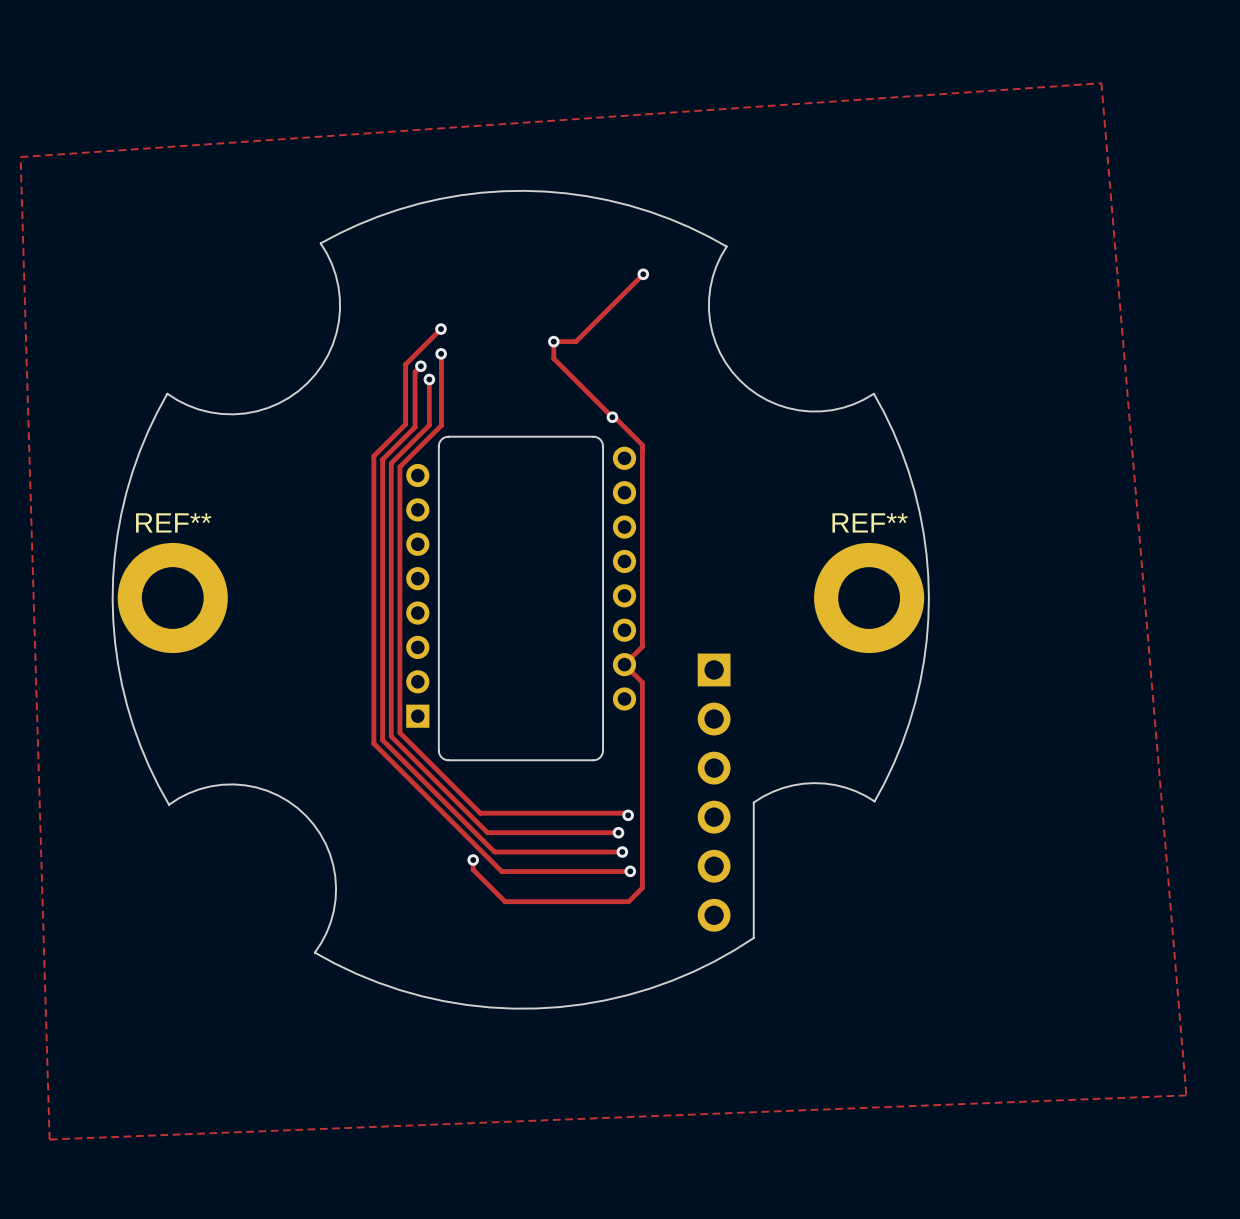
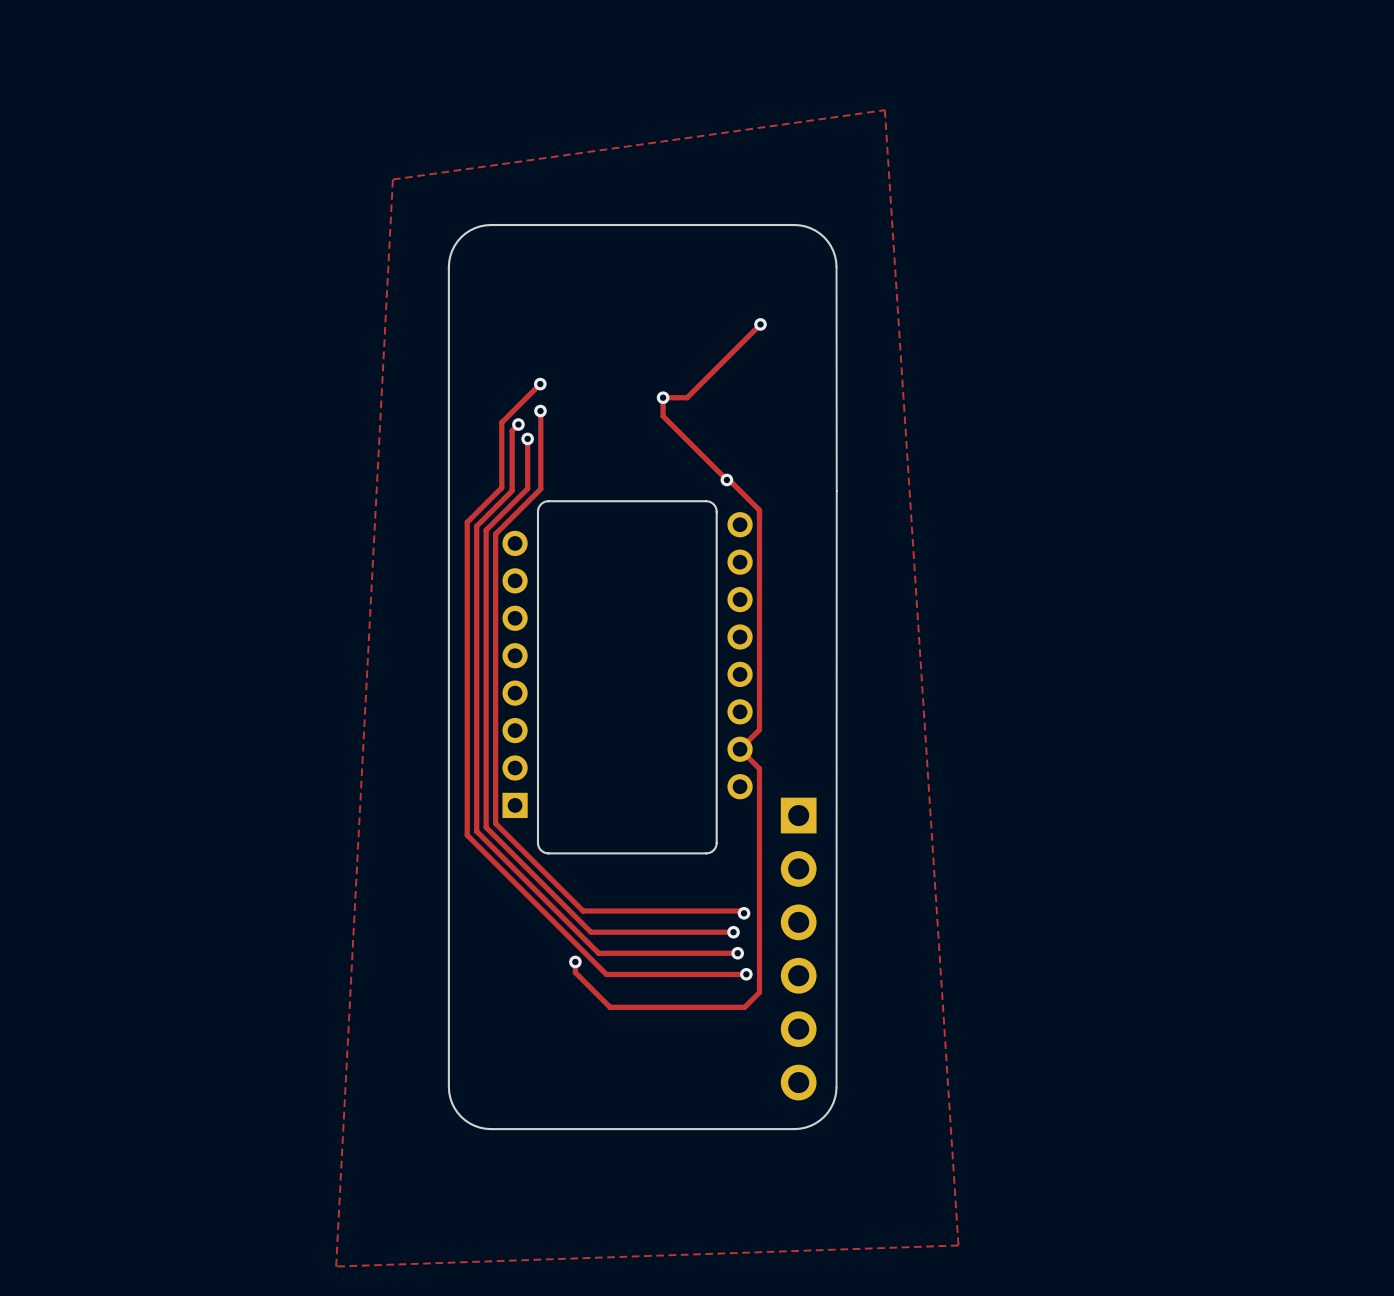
zone outline: none -> (884, 110) (392, 179) (336, 1266) (958, 1245) (884, 110)
zone outline: (1101, 83) (20, 157) (49, 1139) (1186, 1095) (1101, 83) -> none
board edge: none -> (490, 225) (799, 225) (820, 233) (833, 250) (836, 267) (836, 1087) (830, 1108) (820, 1120) (810, 1125) (794, 1129) (490, 1129) (474, 1125) (465, 1120) (452, 1103) (448, 1087) (448, 267) (452, 250) (461, 237) (474, 228) (490, 225)
board edge: (320, 243) (339, 233) (358, 224) (398, 209) (439, 199) (481, 192) (545, 191) (587, 196) (629, 205) (688, 227) (726, 246) (716, 266) (710, 287) (710, 321) (715, 343) (725, 363) (748, 387) (777, 404) (810, 411) (843, 407) (873, 393) (901, 451) (914, 492) (923, 533) (928, 576) (928, 618) (923, 661) (915, 703) (902, 743) (874, 801) (845, 787) (814, 783) (782, 788) (753, 802) (753, 937) (734, 950) (671, 980) (627, 995) (582, 1004) (536, 1008) (490, 1007) (421, 996) (356, 973) (314, 952) (326, 932) (333, 911) (335, 876) (325, 843) (313, 824) (297, 807) (267, 790) (233, 784) (199, 789) (169, 804) (149, 766) (133, 726) (122, 684) (115, 642) (112, 599) (114, 556) (126, 492) (139, 452) (167, 393) (187, 405) (210, 412) (245, 413) (278, 403) (298, 390) (315, 374) (332, 344) (340, 309) (335, 275) (326, 253) (320, 243) -> none
REF**: (172, 598) -> none
REF**: (869, 598) -> none
part position: (714, 792) -> (798, 949)

